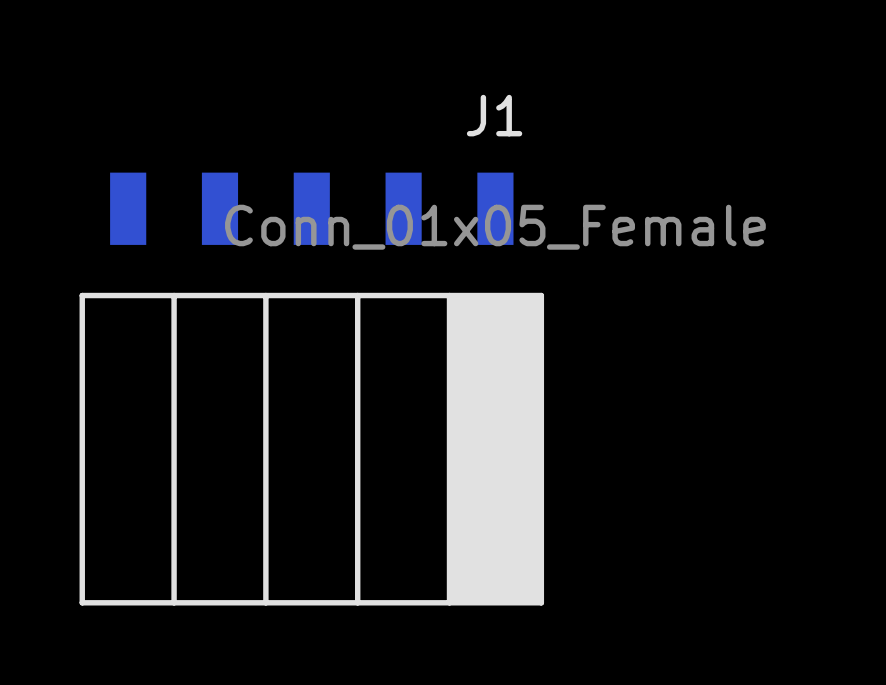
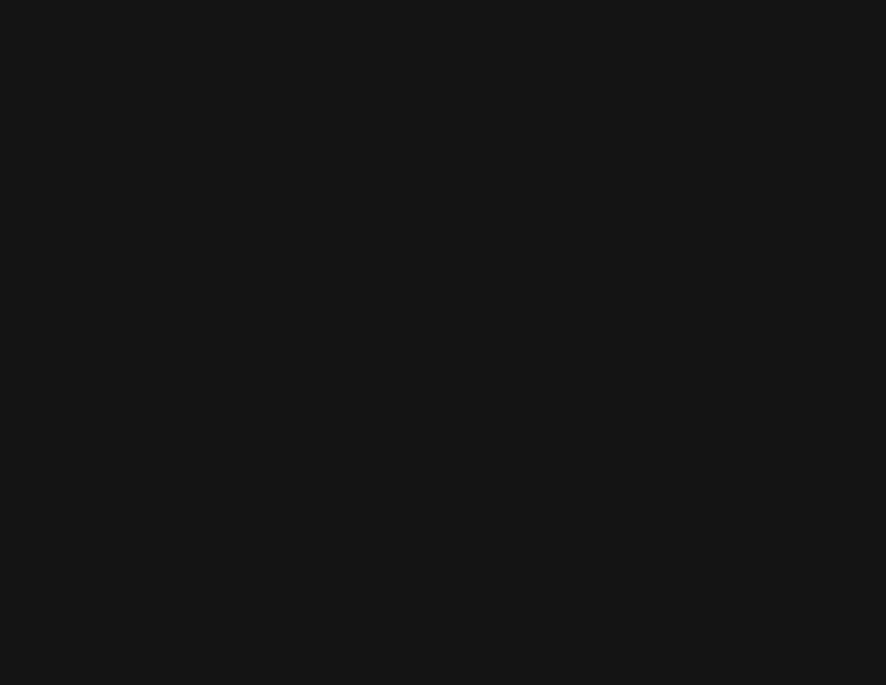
J1: Conn_01x05_Female (311, 389) -> none

